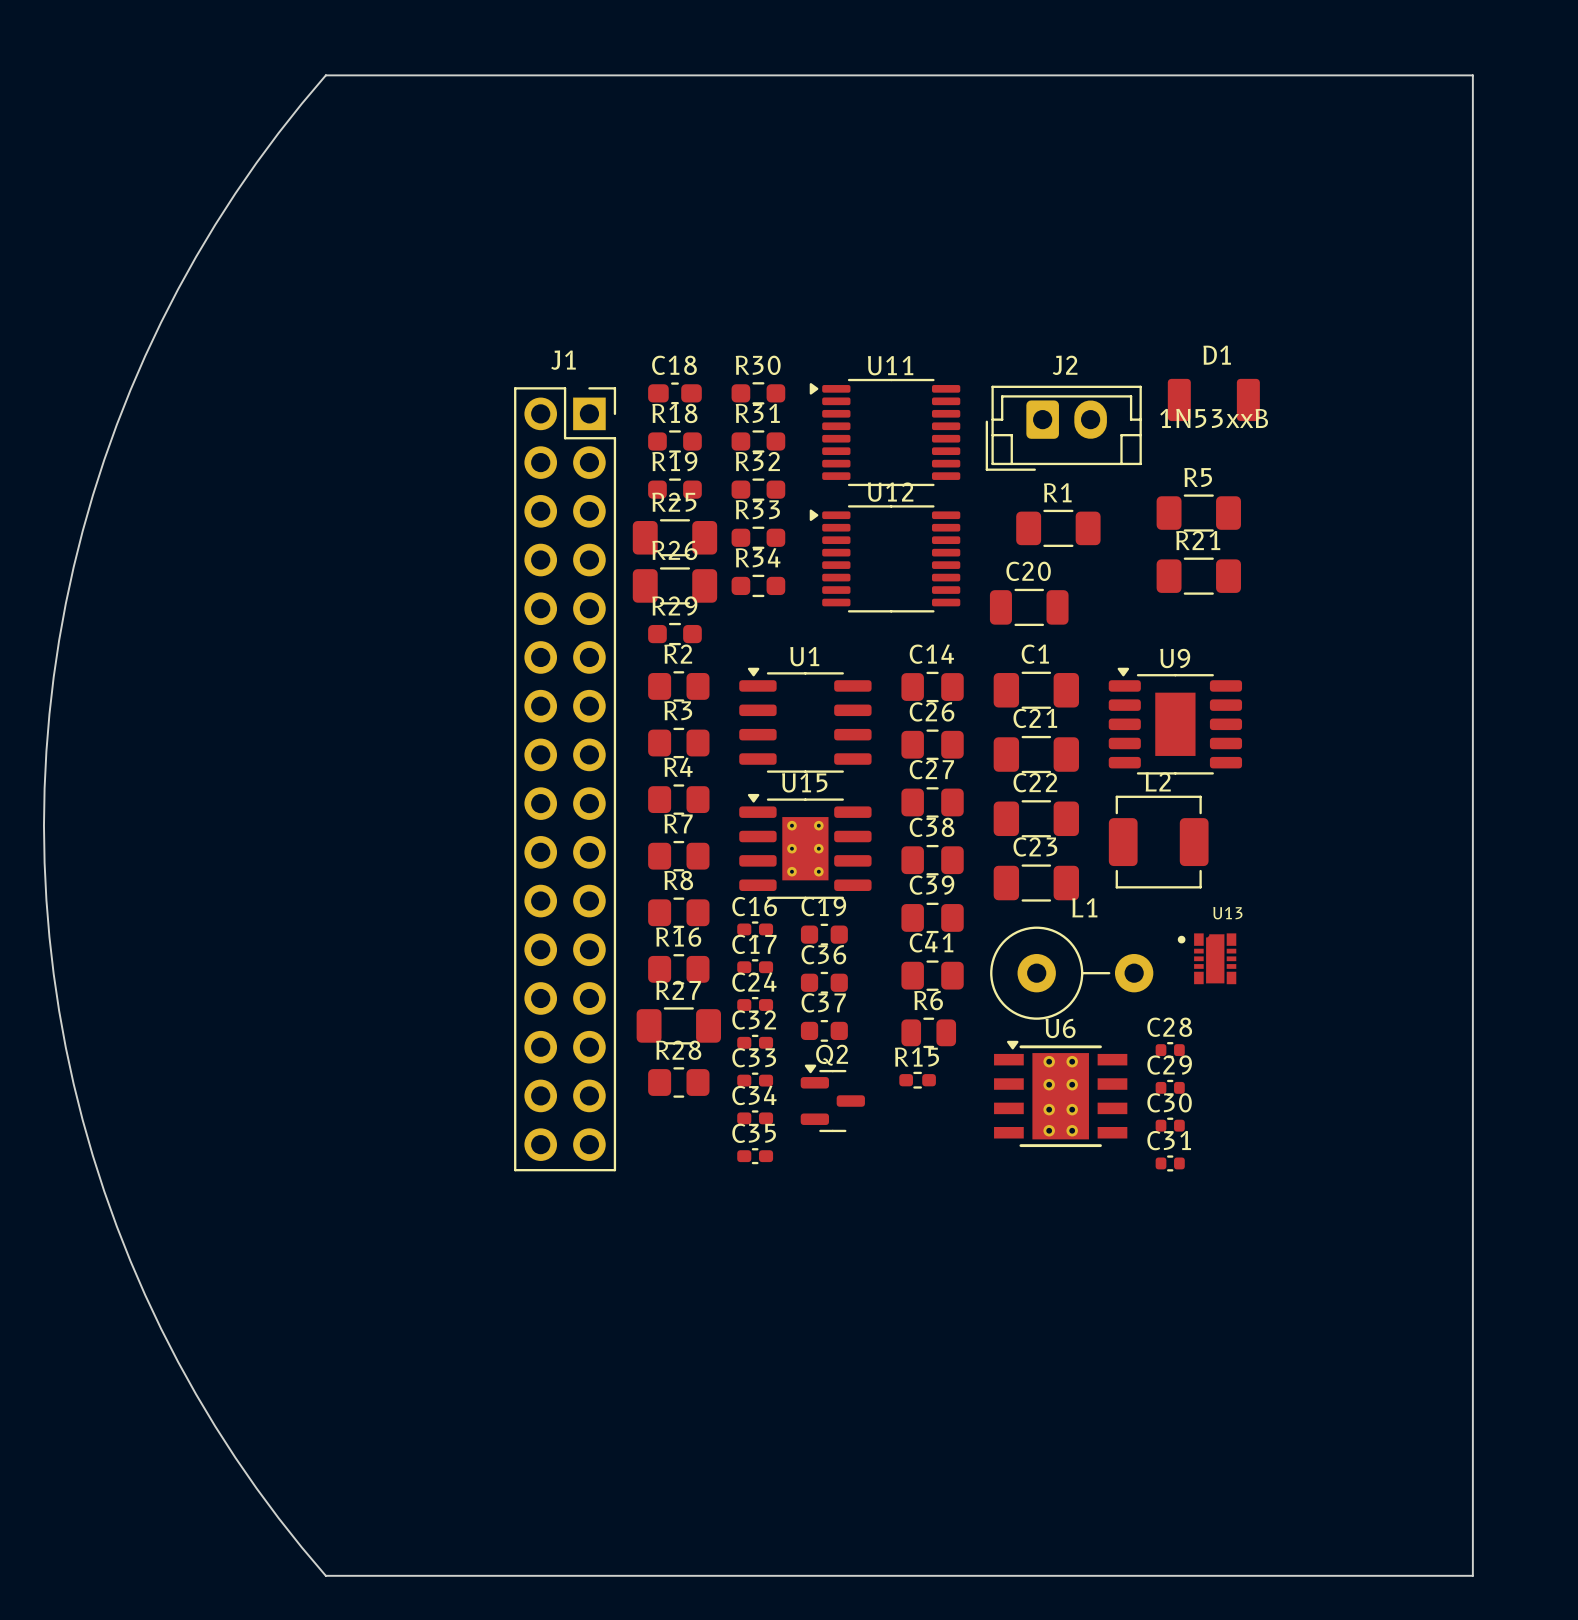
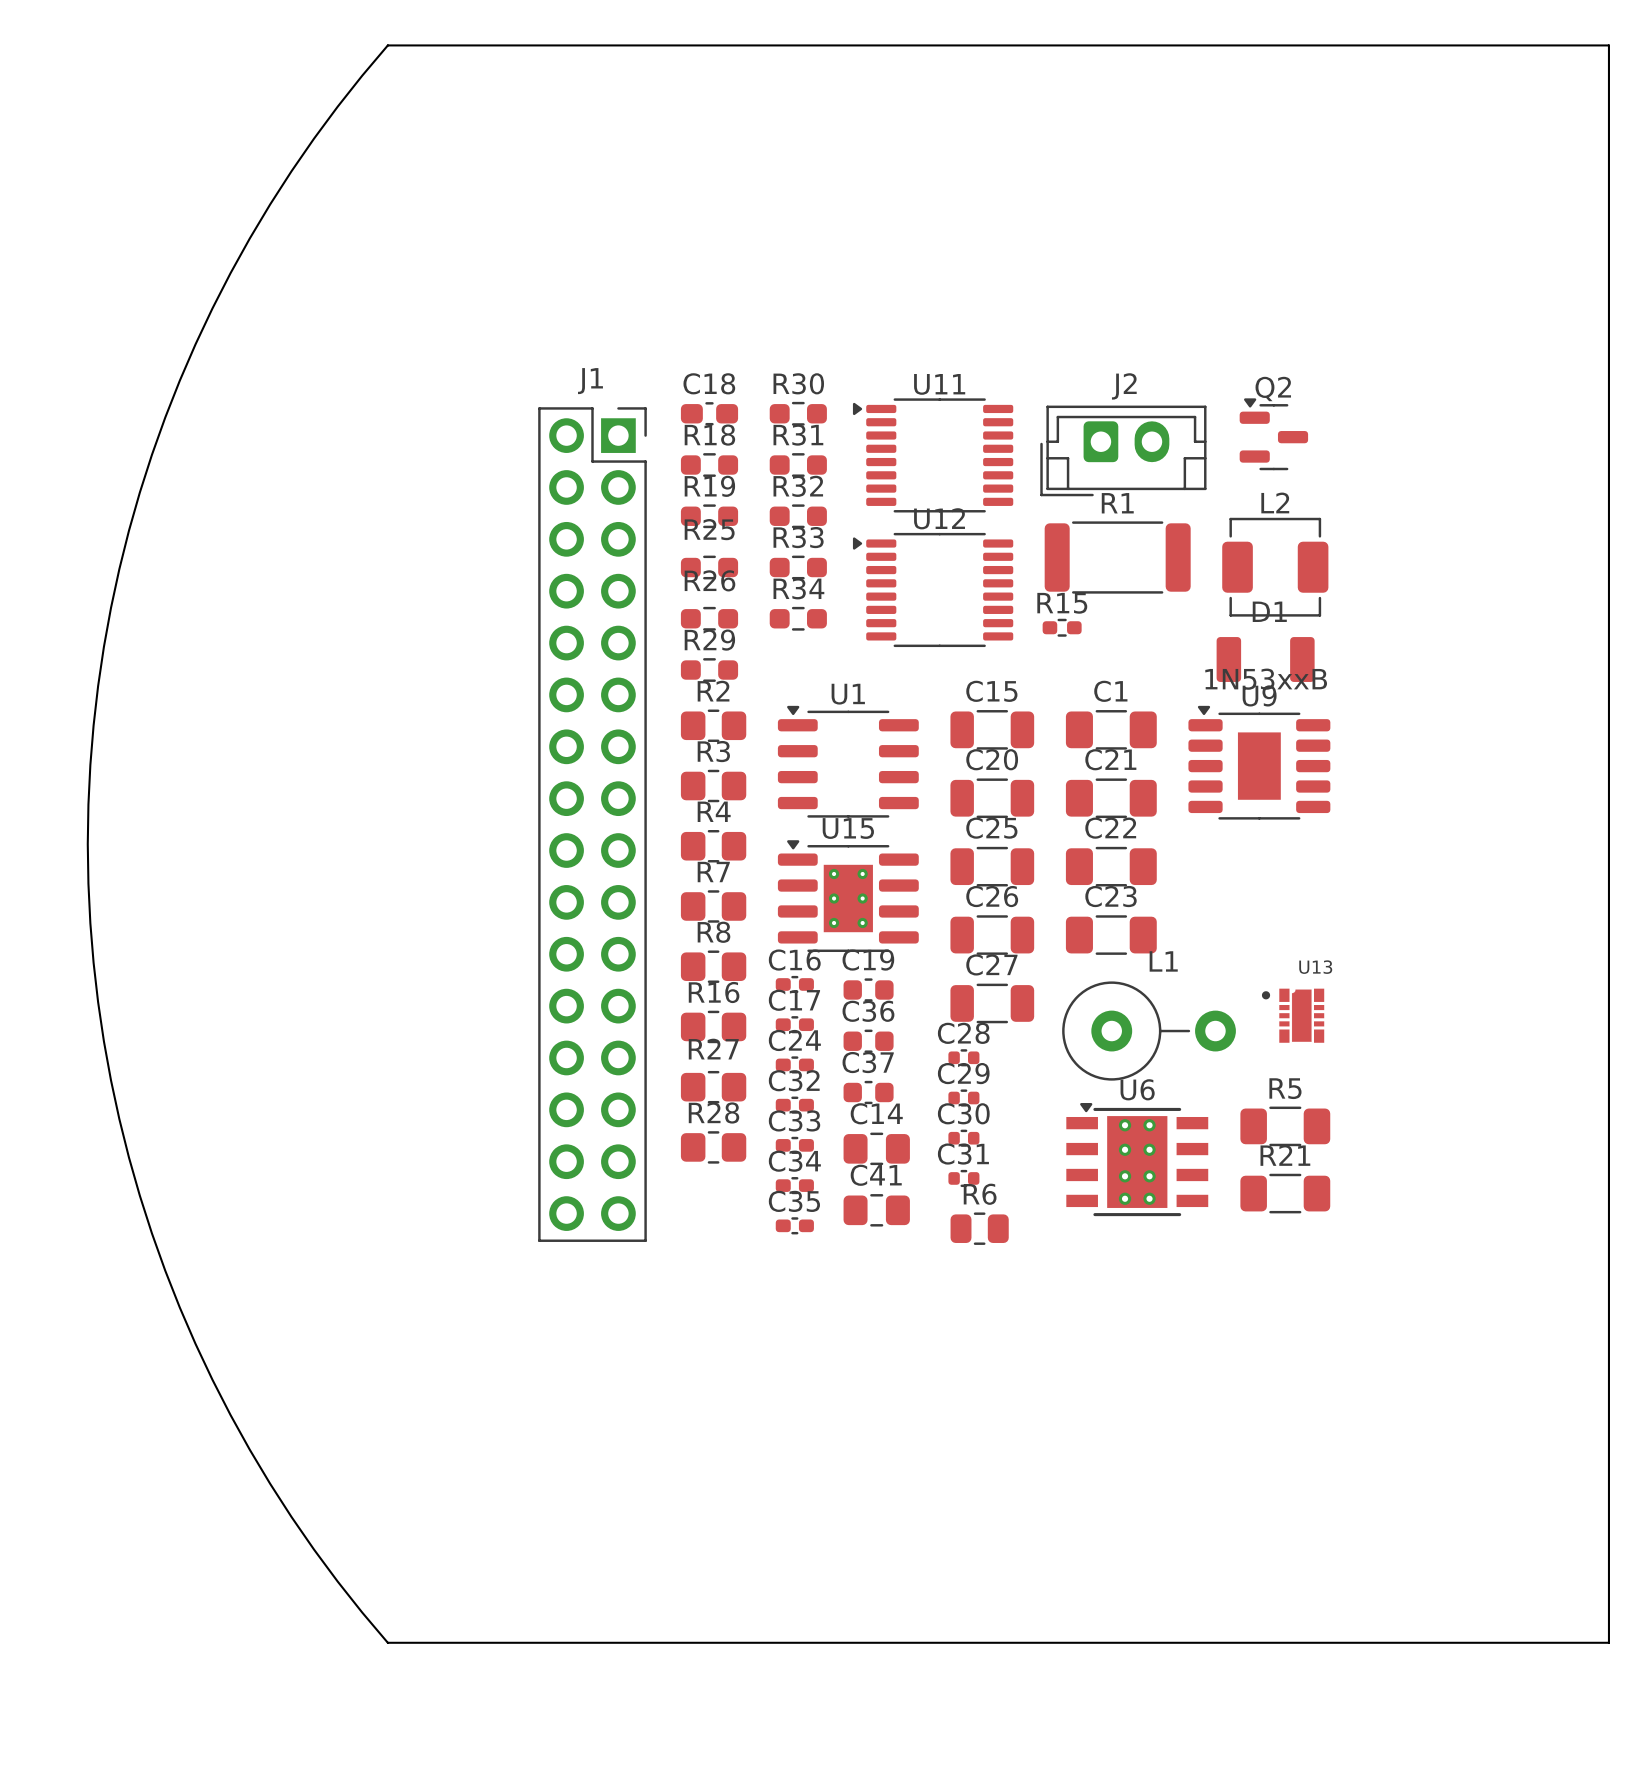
board edge: (325, 75) (1472, 75) (1472, 1575) (325, 1575) (278, 1518) (235, 1457) (178, 1361) (145, 1295) (104, 1191) (73, 1083) (53, 974) (44, 862) (44, 788) (53, 677) (73, 567) (104, 459) (130, 390) (178, 289) (215, 224) (278, 132) (325, 75) -> (387, 45) (1608, 45) (1608, 1642) (387, 1642) (337, 1581) (270, 1483) (230, 1415) (179, 1307) (151, 1233) (119, 1119) (98, 1002) (88, 883) (88, 804) (93, 725) (111, 607) (139, 492) (179, 380) (230, 273) (270, 204) (337, 106) (387, 45)
D1 position: (1213, 399) -> (1265, 659)
R1 footprint: [1016, 509, 1101, 547] -> [1044, 521, 1191, 594]
R5 position: (1198, 513) -> (1285, 1126)
R25 footprint: [632, 519, 718, 557] -> [680, 555, 739, 580]
R26 footprint: [632, 567, 718, 605] -> [680, 606, 739, 631]
R21 position: (1198, 576) -> (1285, 1193)
C20 position: (1029, 607) -> (992, 798)
C14 position: (932, 687) -> (876, 1148)
C15: none -> (992, 729)
C1 position: (1036, 690) -> (1111, 729)
U9 position: (1175, 721) -> (1259, 762)
C26 footprint: [901, 729, 964, 760] -> [950, 915, 1035, 955]
C21 position: (1036, 754) -> (1111, 798)
C27 footprint: [901, 787, 964, 818] -> [950, 983, 1035, 1024]
C25: none -> (992, 866)
C22 position: (1036, 818) -> (1111, 866)
L2 position: (1158, 842) -> (1275, 567)
C38: (932, 860) -> none
C23 position: (1036, 883) -> (1111, 935)
C39: (932, 917) -> none
U13 position: (1207, 958) -> (1293, 1015)
L1 position: (1071, 973) -> (1149, 1031)
C41 position: (932, 975) -> (876, 1210)
R27 footprint: [636, 1007, 722, 1045] -> [680, 1070, 747, 1104]
R6 position: (928, 1032) -> (979, 1228)
C28 position: (1170, 1050) -> (963, 1057)
R15 position: (917, 1080) -> (1062, 627)
C29 position: (1170, 1087) -> (963, 1098)
U6 position: (1060, 1093) -> (1137, 1159)
Q2 position: (832, 1098) -> (1273, 434)
C30 position: (1170, 1125) -> (963, 1138)
C31 position: (1170, 1163) -> (963, 1178)

